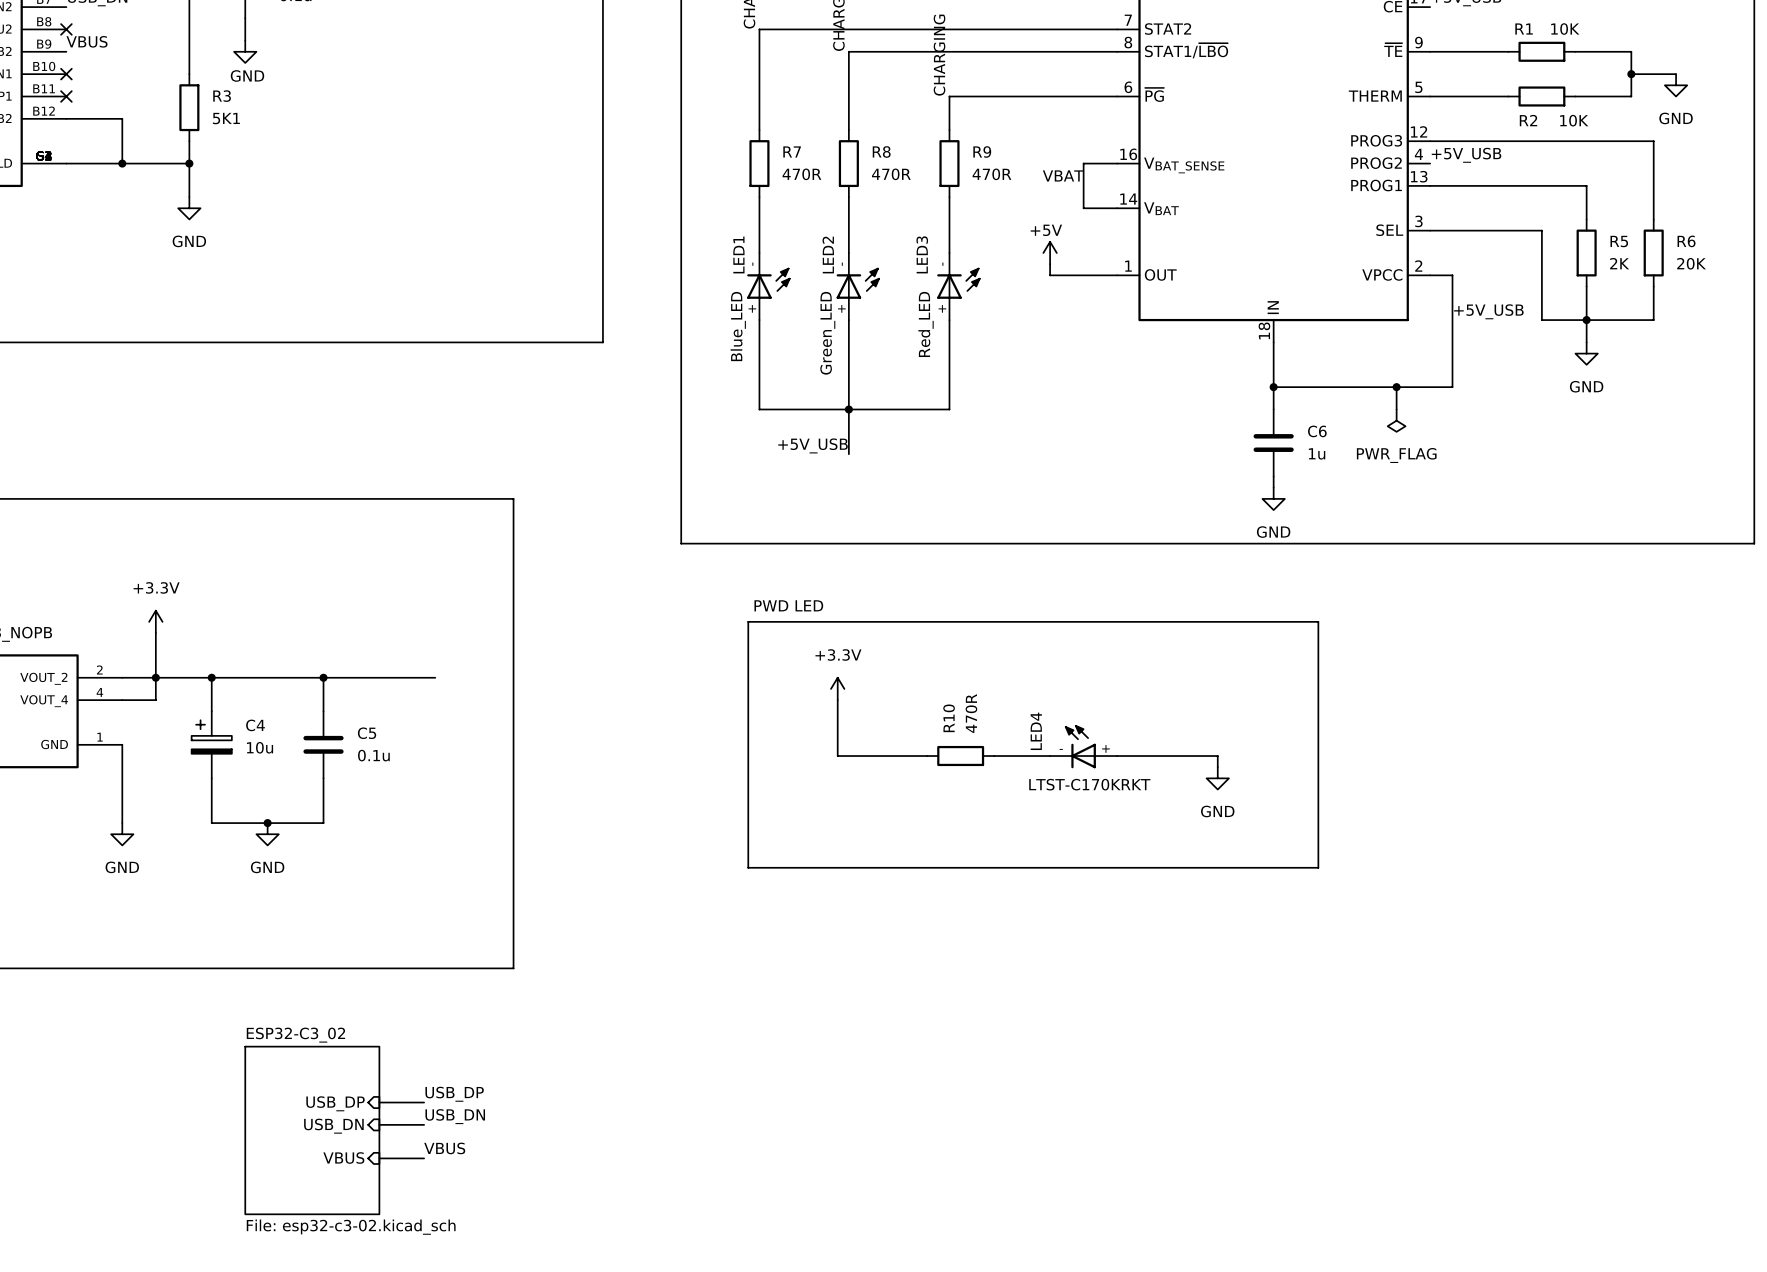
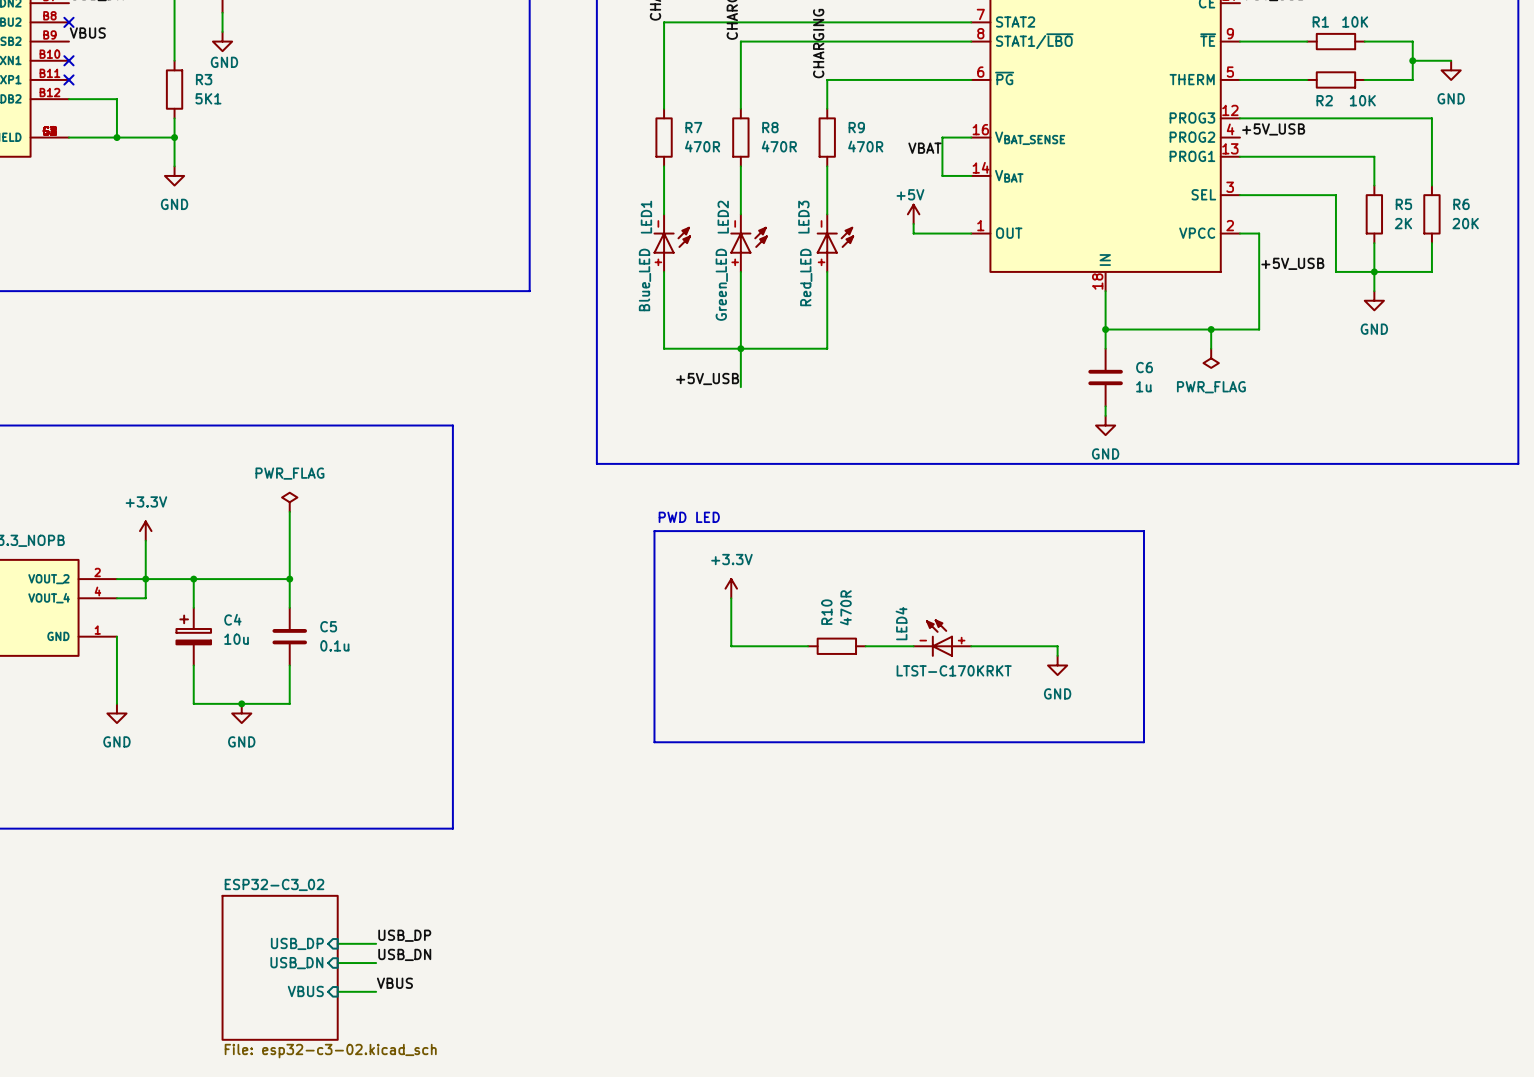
power symbol: none -> PWR_FLAG (289, 502)
wire: (323, 677) (435, 677) -> (289, 579) (289, 511)

